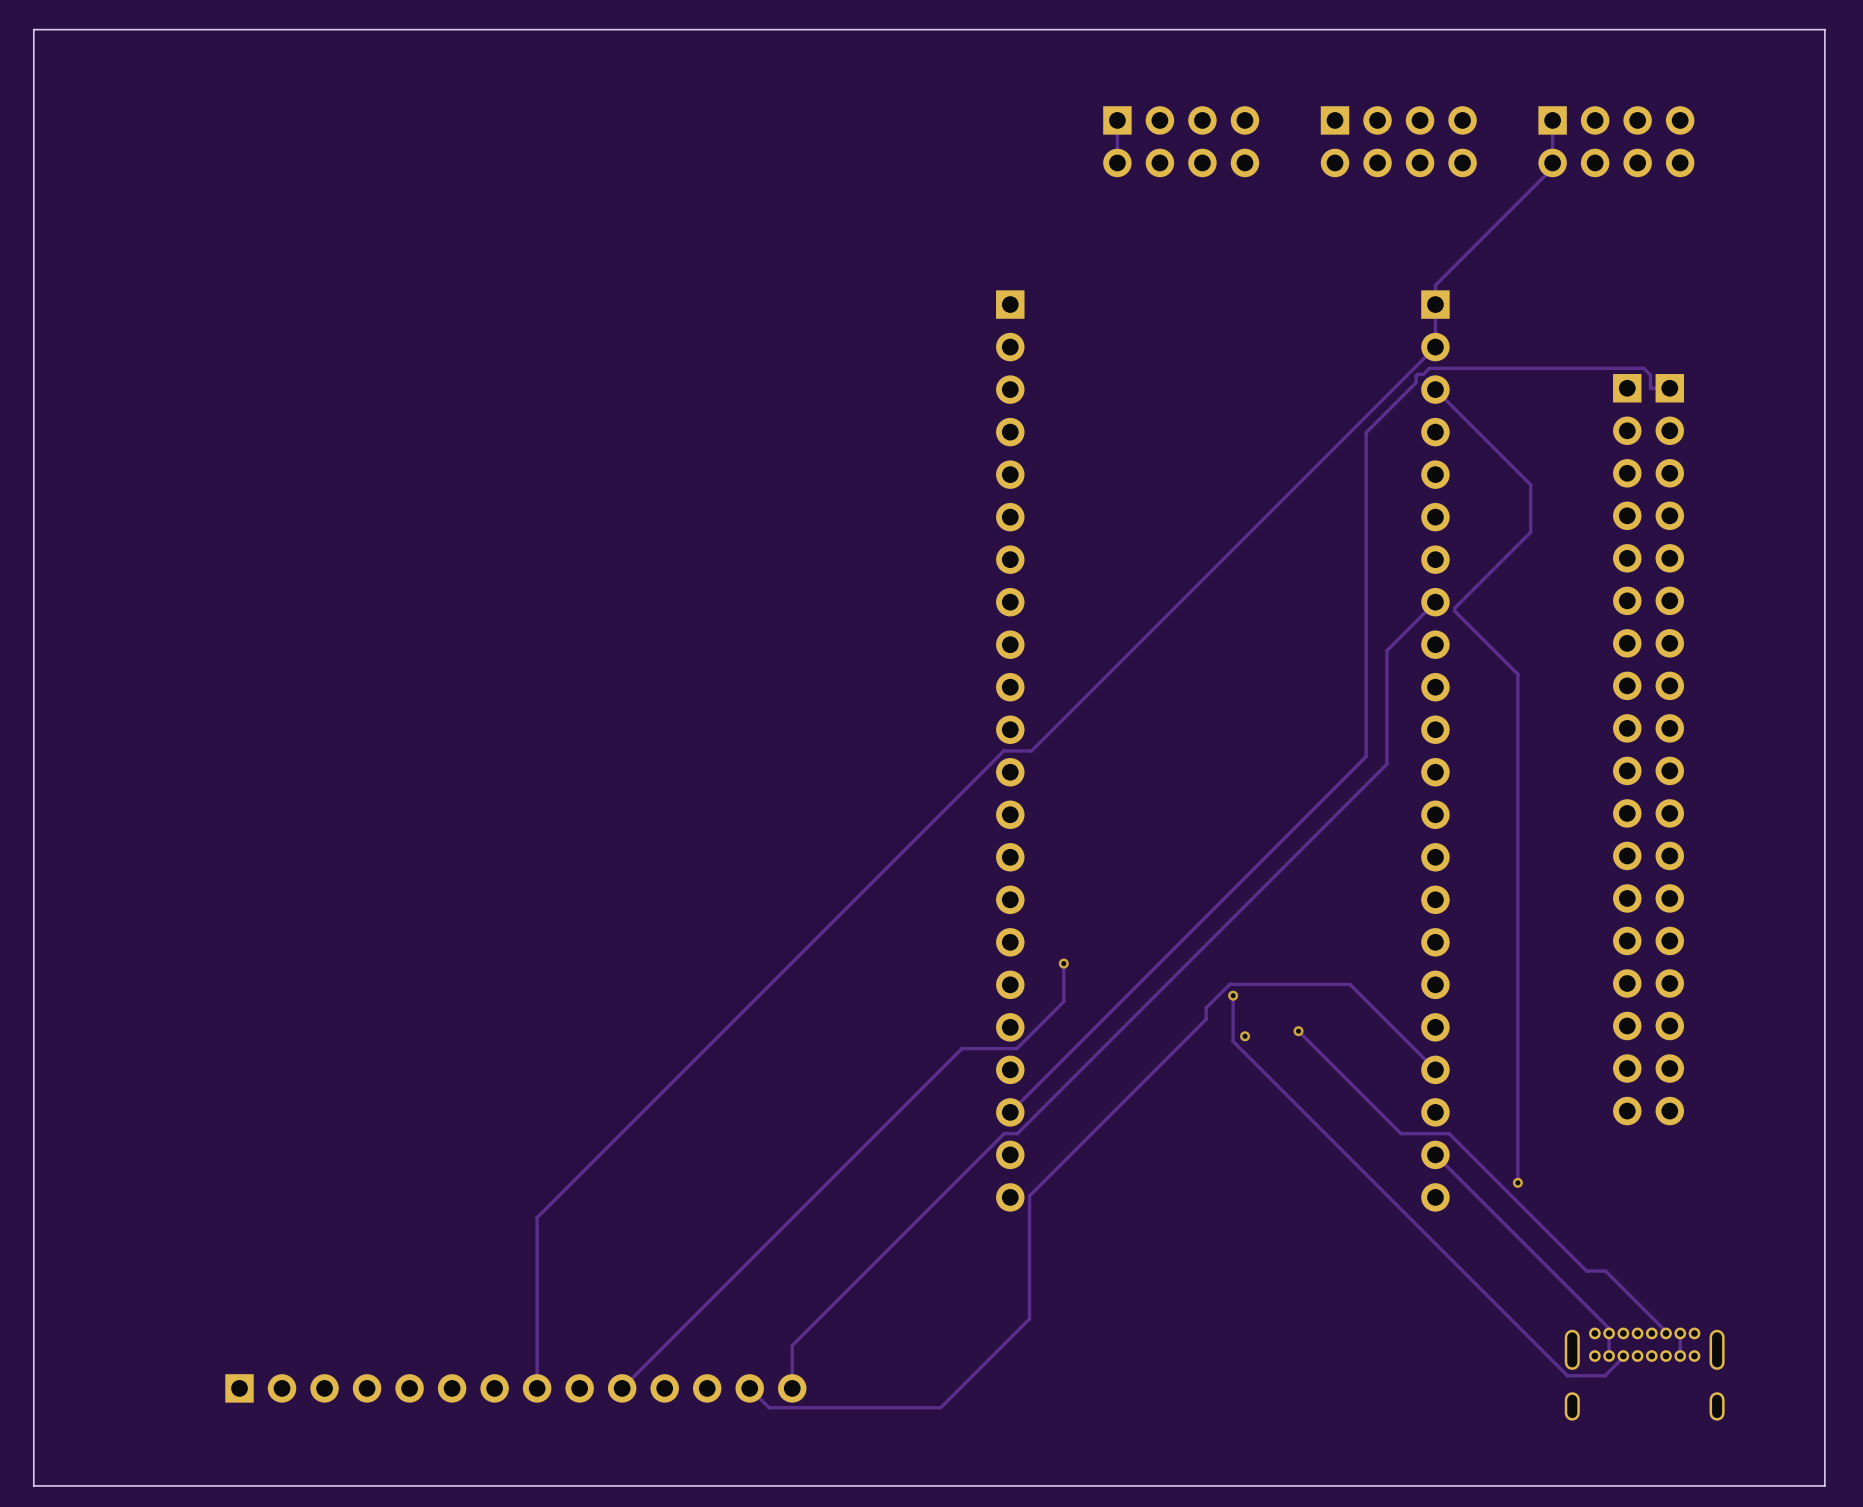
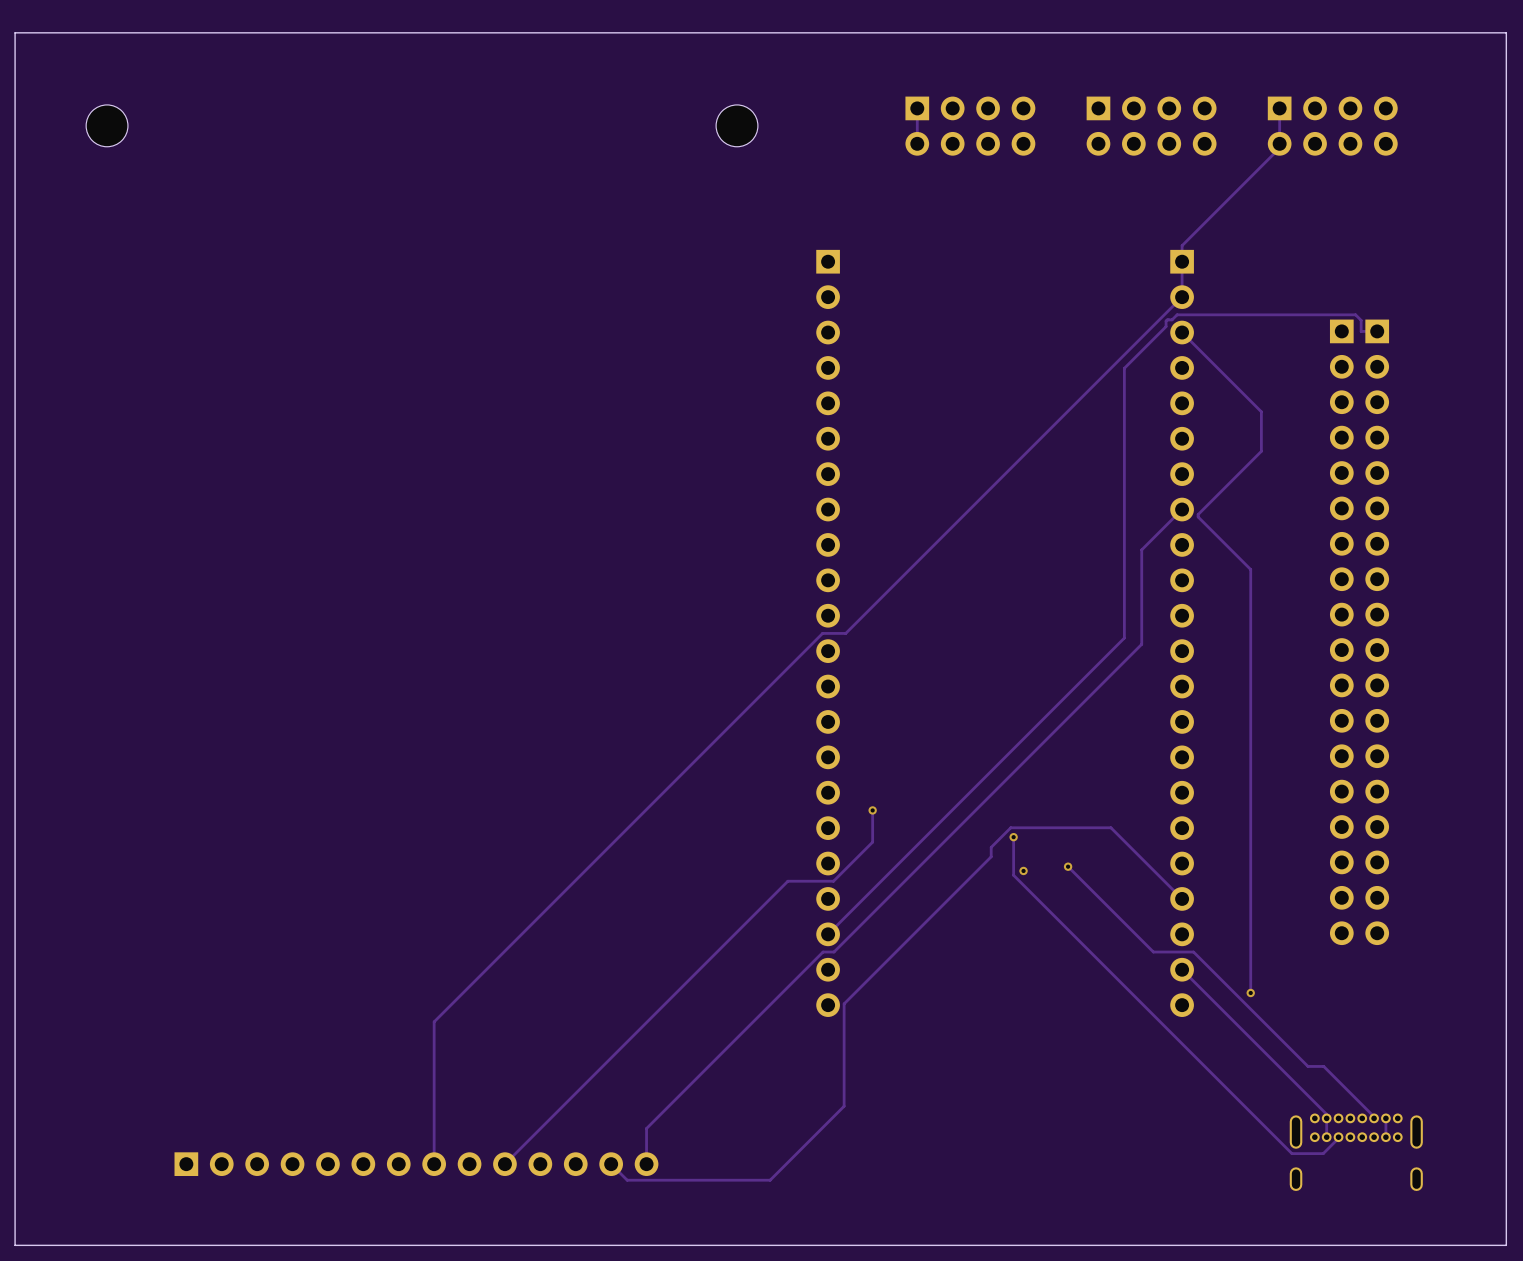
part: none -> (107, 125)
part: none -> (737, 125)

